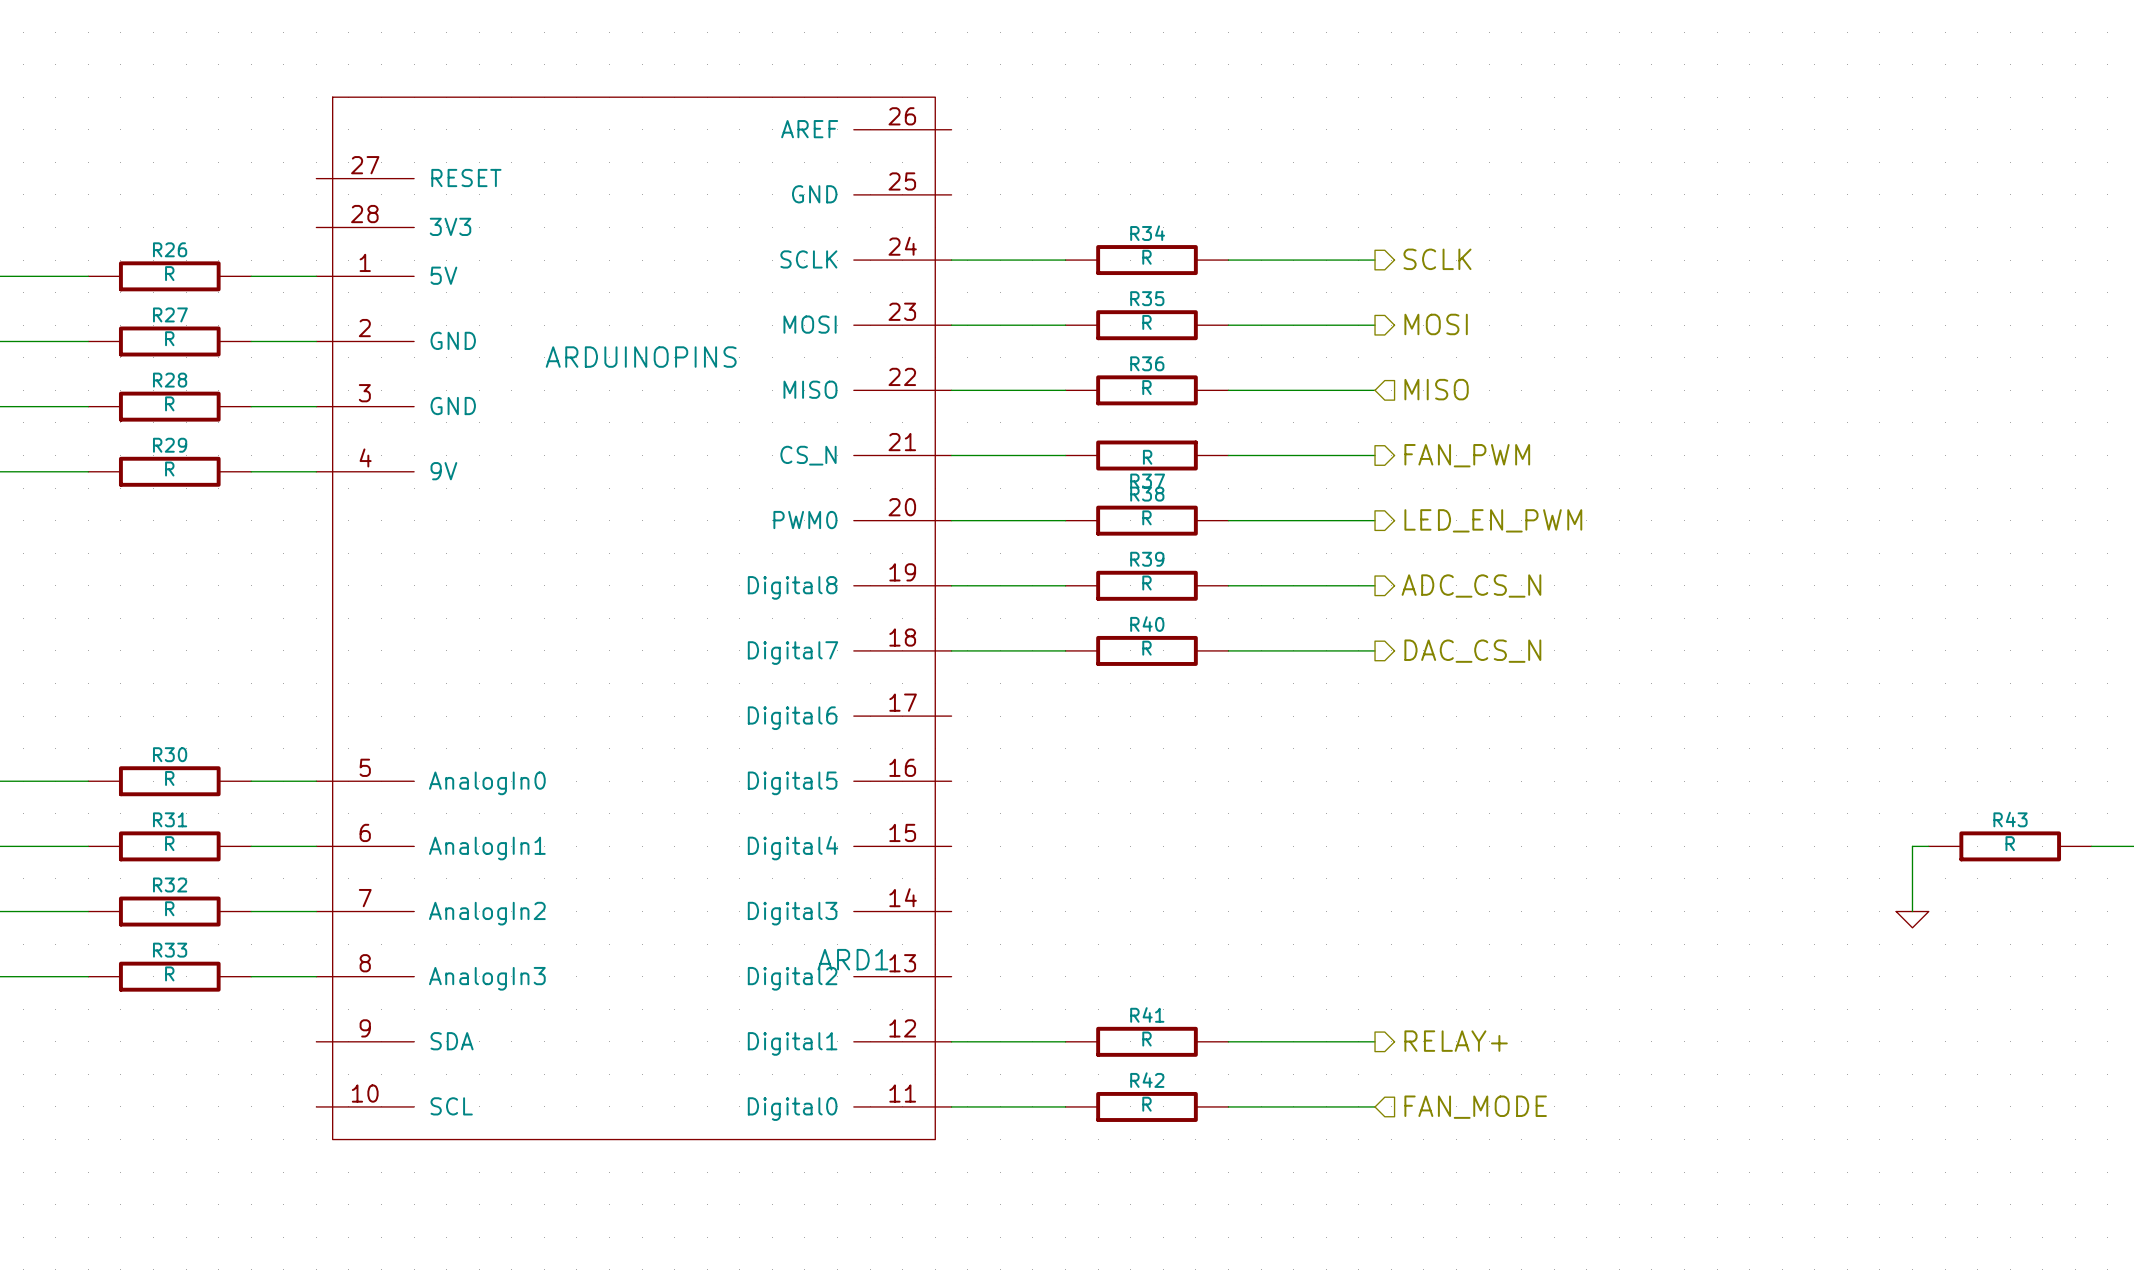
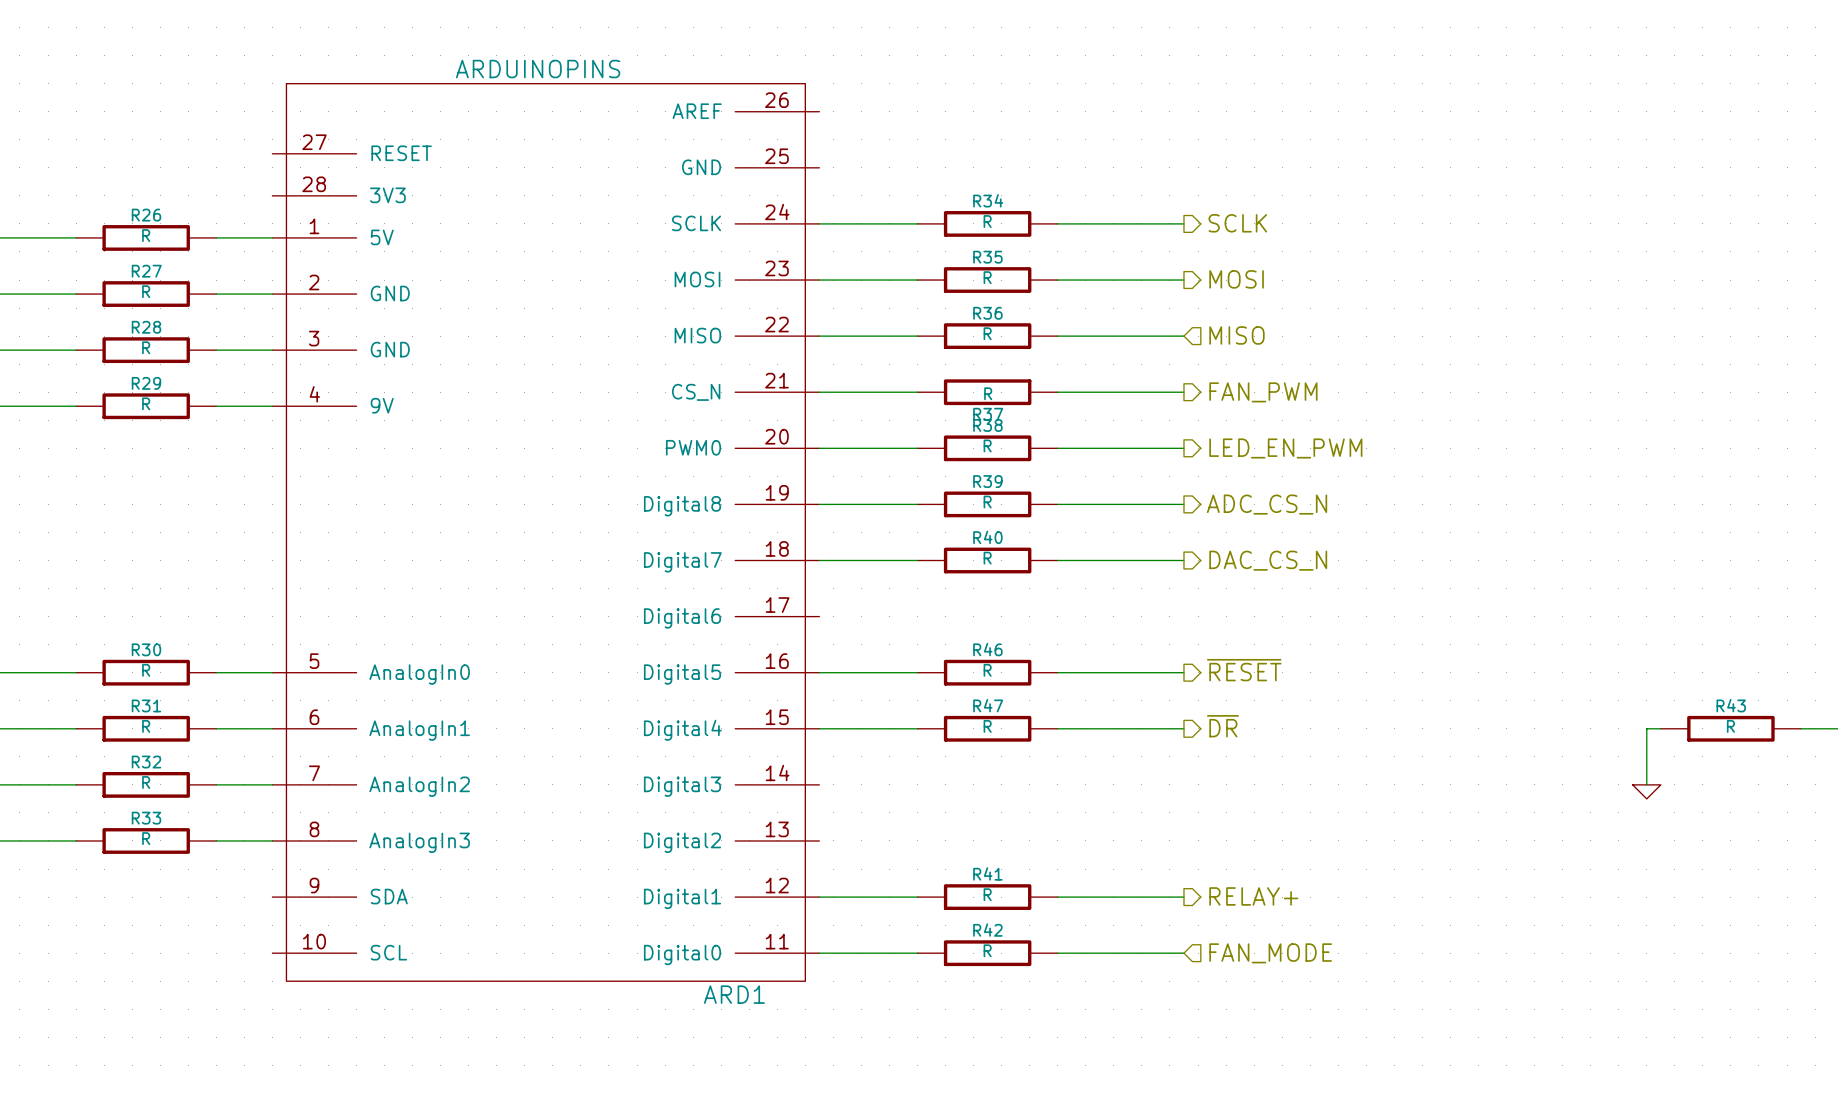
ARD1 value position: ARDUINOPINS (641, 357) -> ARDUINOPINS (538, 69)
hierarchical label: none -> ~{RESET} (1244, 670)
wire: none -> (819, 672) (917, 672)
R46: none -> R (987, 672)
wire: none -> (1057, 672) (1183, 672)
hierarchical label: none -> ~{DR} (1222, 726)
wire: none -> (819, 728) (917, 728)
R47: none -> R (987, 728)
wire: none -> (1057, 728) (1183, 728)
ARD1 name position: ARD1 (852, 959) -> ARD1 (734, 994)

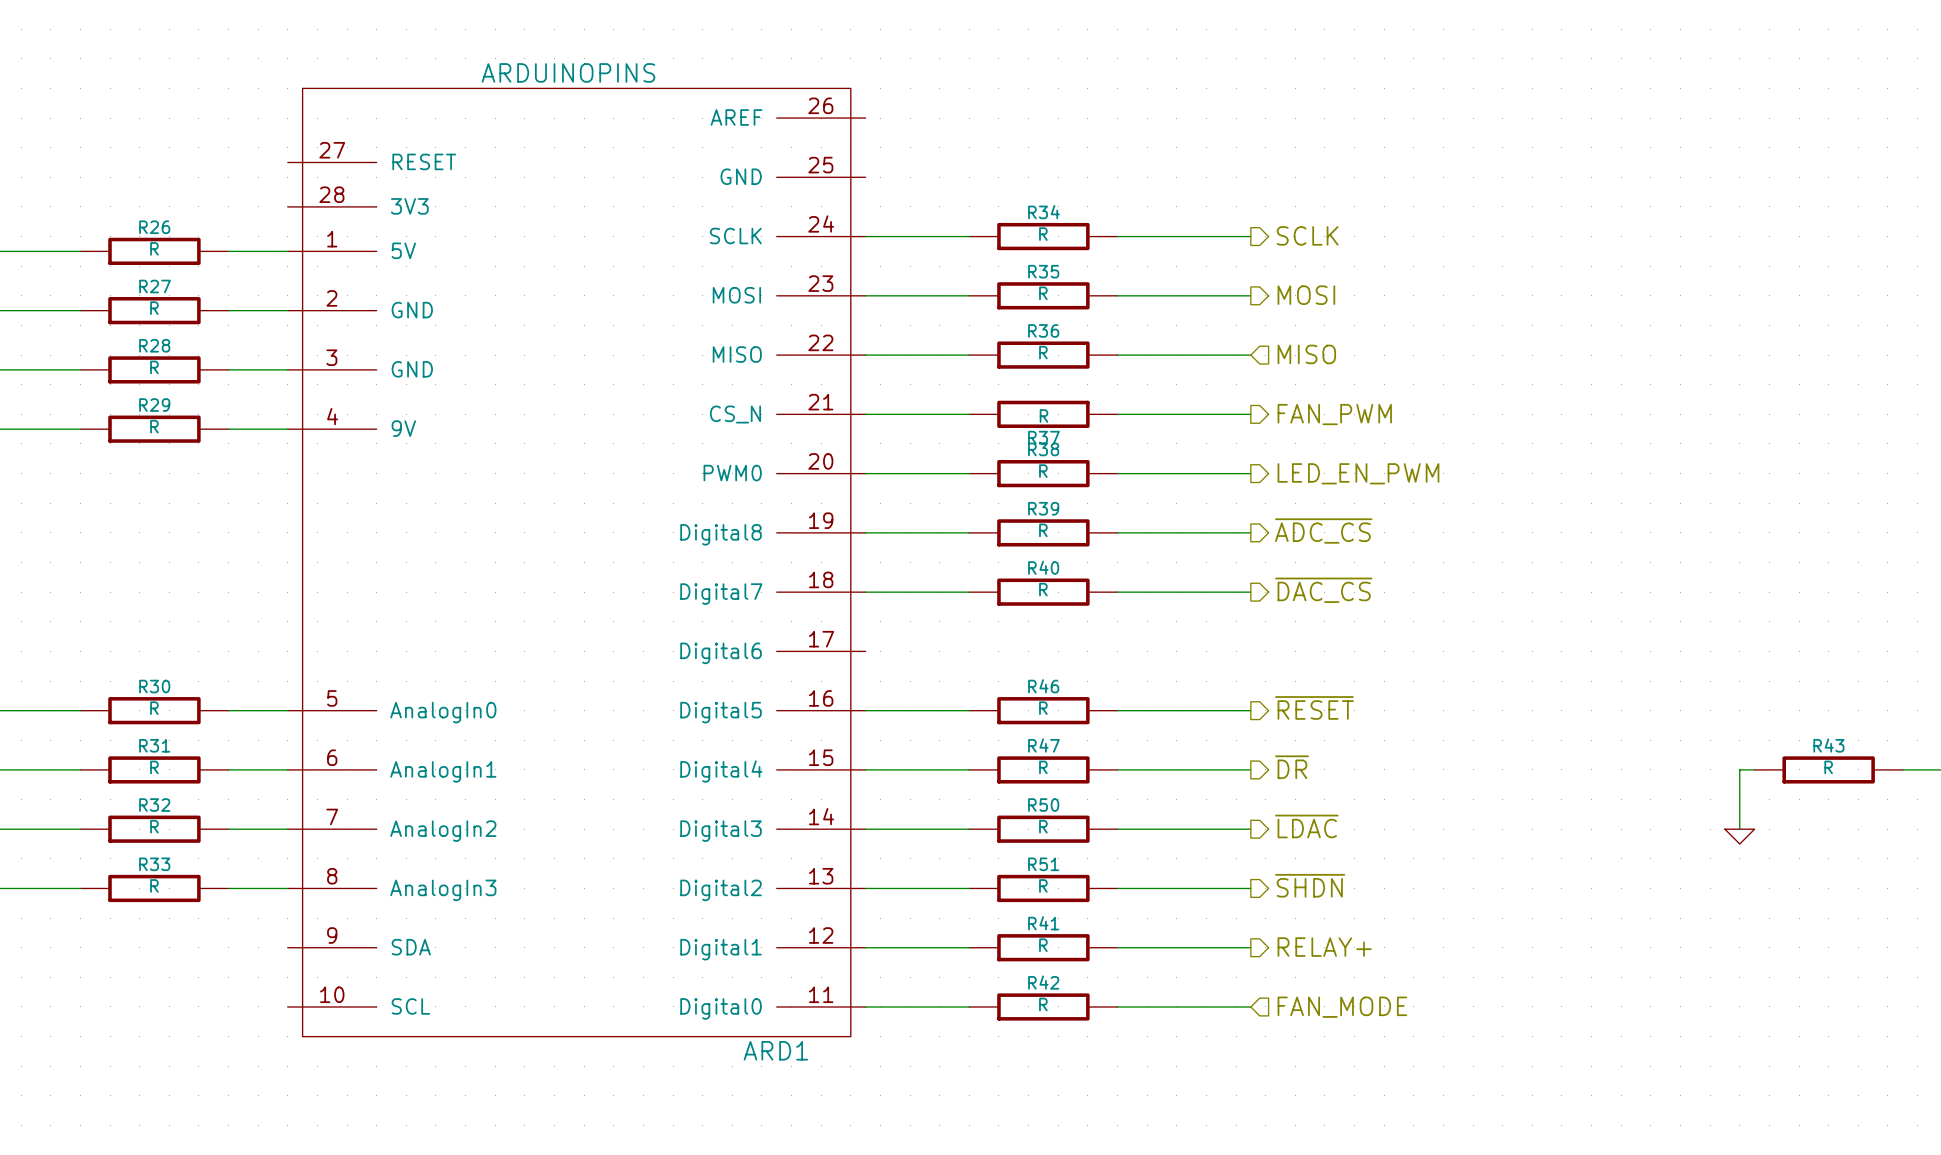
hierarchical label: ADC_CS_N (1267, 504) -> ~{ADC_CS} (1323, 531)
hierarchical label: DAC_CS_N (1268, 560) -> ~{DAC_CS} (1323, 590)
hierarchical label: none -> ~{LDAC} (1306, 826)
wire: none -> (865, 829) (969, 829)
R50: none -> R (1043, 829)
wire: none -> (1117, 829) (1250, 829)
hierarchical label: none -> ~{SHDN} (1310, 885)
wire: none -> (865, 888) (969, 888)
R51: none -> R (1043, 888)
wire: none -> (1117, 888) (1250, 888)

